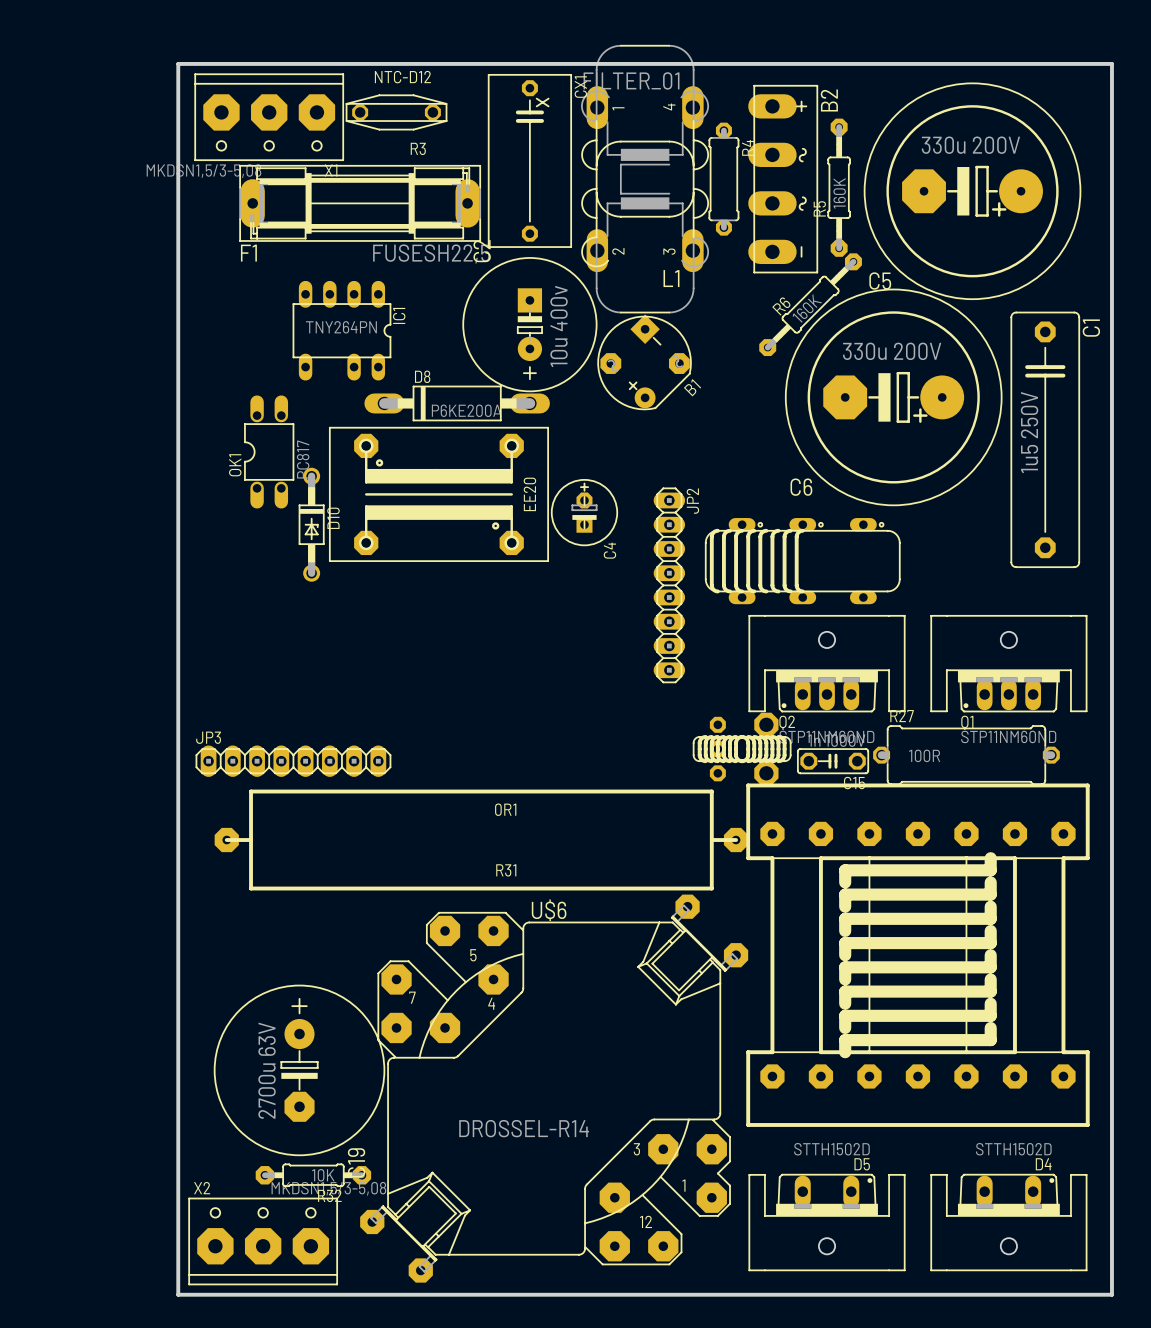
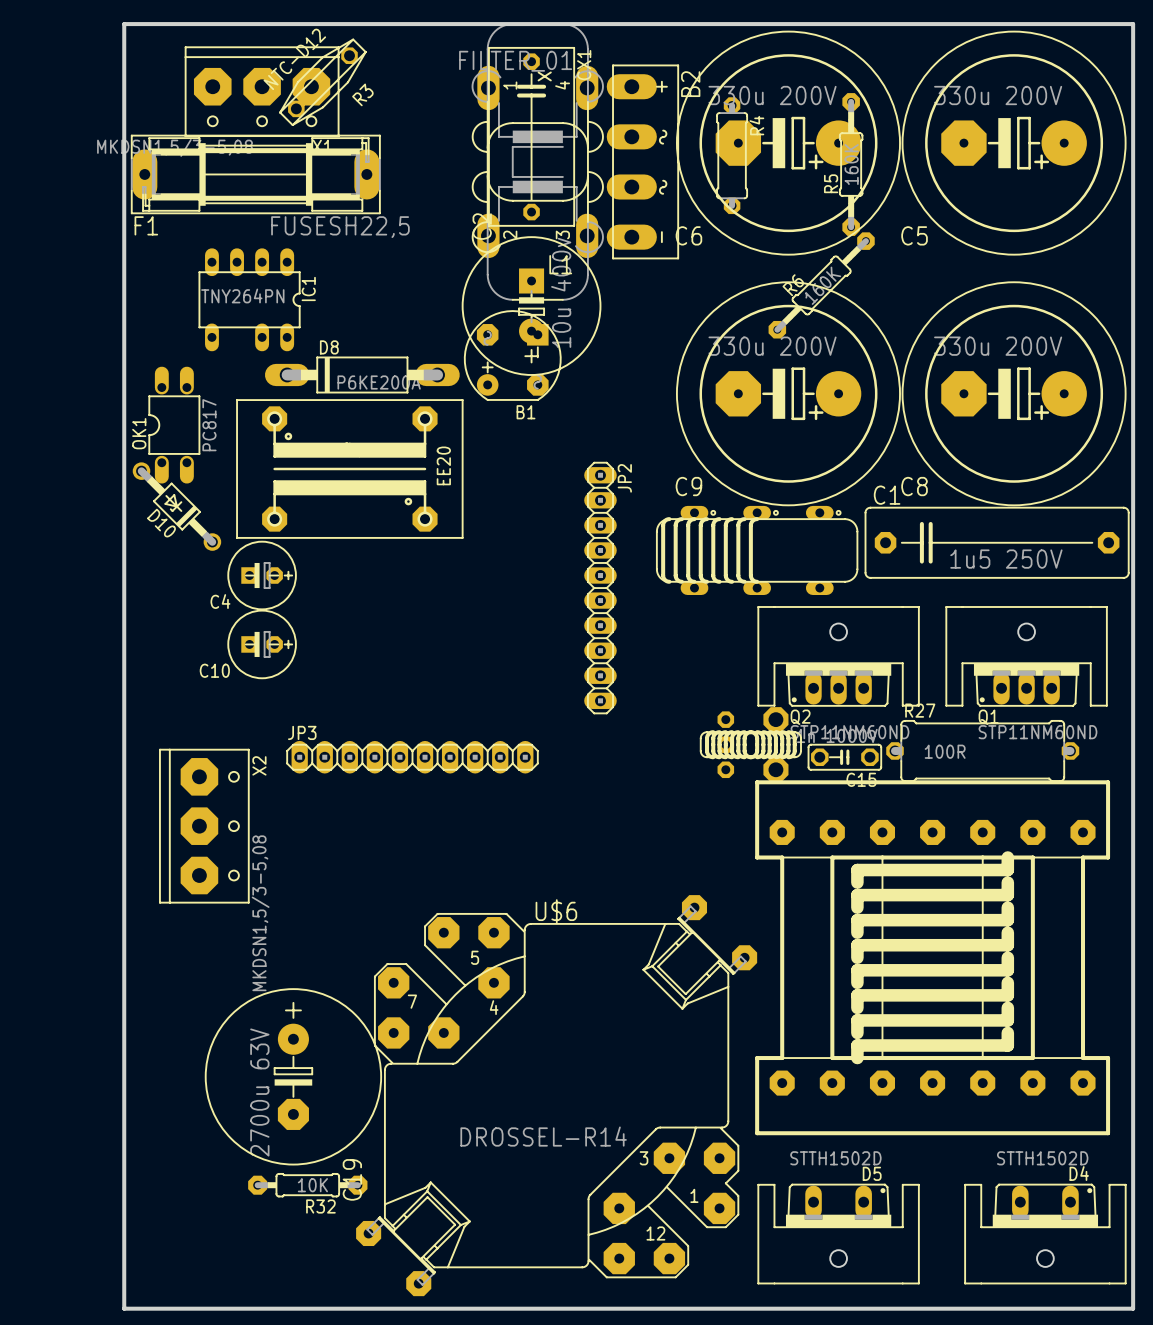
board edge: (1111, 63) (178, 63) (178, 1294) -> (1133, 36) (1133, 24) (124, 24) (124, 1308) (168, 1308)
R3 rotation: 0° (396, 112) -> 45° counterclockwise (322, 82)
R3 position: (396, 112) -> (322, 82)
L1 position: (645, 179) -> (537, 161)
B2 position: (783, 179) -> (642, 161)
C5 position: (972, 191) -> (1014, 143)
F1 position: (360, 203) -> (255, 174)
IC1 position: (341, 330) -> (249, 299)
B1 rotation: 0° (644, 362) -> 45° clockwise (512, 355)
B1 position: (644, 362) -> (512, 355)
D8 footprint: [364, 385, 550, 422] -> [264, 356, 460, 394]
C6 position: (893, 397) -> (788, 143)
C9: none -> 330u 200V (788, 393)
C8: none -> 330u 200V (1014, 393)
C1 rotation: 0° (1045, 439) -> 90° counterclockwise (997, 542)
OK1 position: (269, 451) -> (174, 425)
JP2 footprint: [653, 487, 686, 684] -> [584, 461, 617, 715]
part position: (438, 494) -> (349, 468)
JP2 name position: JP2 (692, 501) -> JP2 (624, 478)
C4 rotation: 0° (584, 512) -> 90° clockwise (262, 575)
C4 position: (584, 512) -> (262, 575)
D10 rotation: 0° (311, 524) -> 135° clockwise (176, 506)
D10 position: (311, 524) -> (176, 506)
part position: (802, 561) -> (757, 550)
C10: none -> (262, 644)
JP3 name position: JP3 (208, 737) -> JP3 (302, 732)
JP3 footprint: [195, 745, 392, 777] -> [286, 740, 539, 774]
R31: 0R1 (481, 840) -> none
D4 position: (1008, 1194) -> (1045, 1205)
part position: (1008, 1222) -> (1045, 1234)
X2 rotation: 0° (263, 1241) -> 90° clockwise (204, 826)
X2 position: (263, 1241) -> (204, 826)

